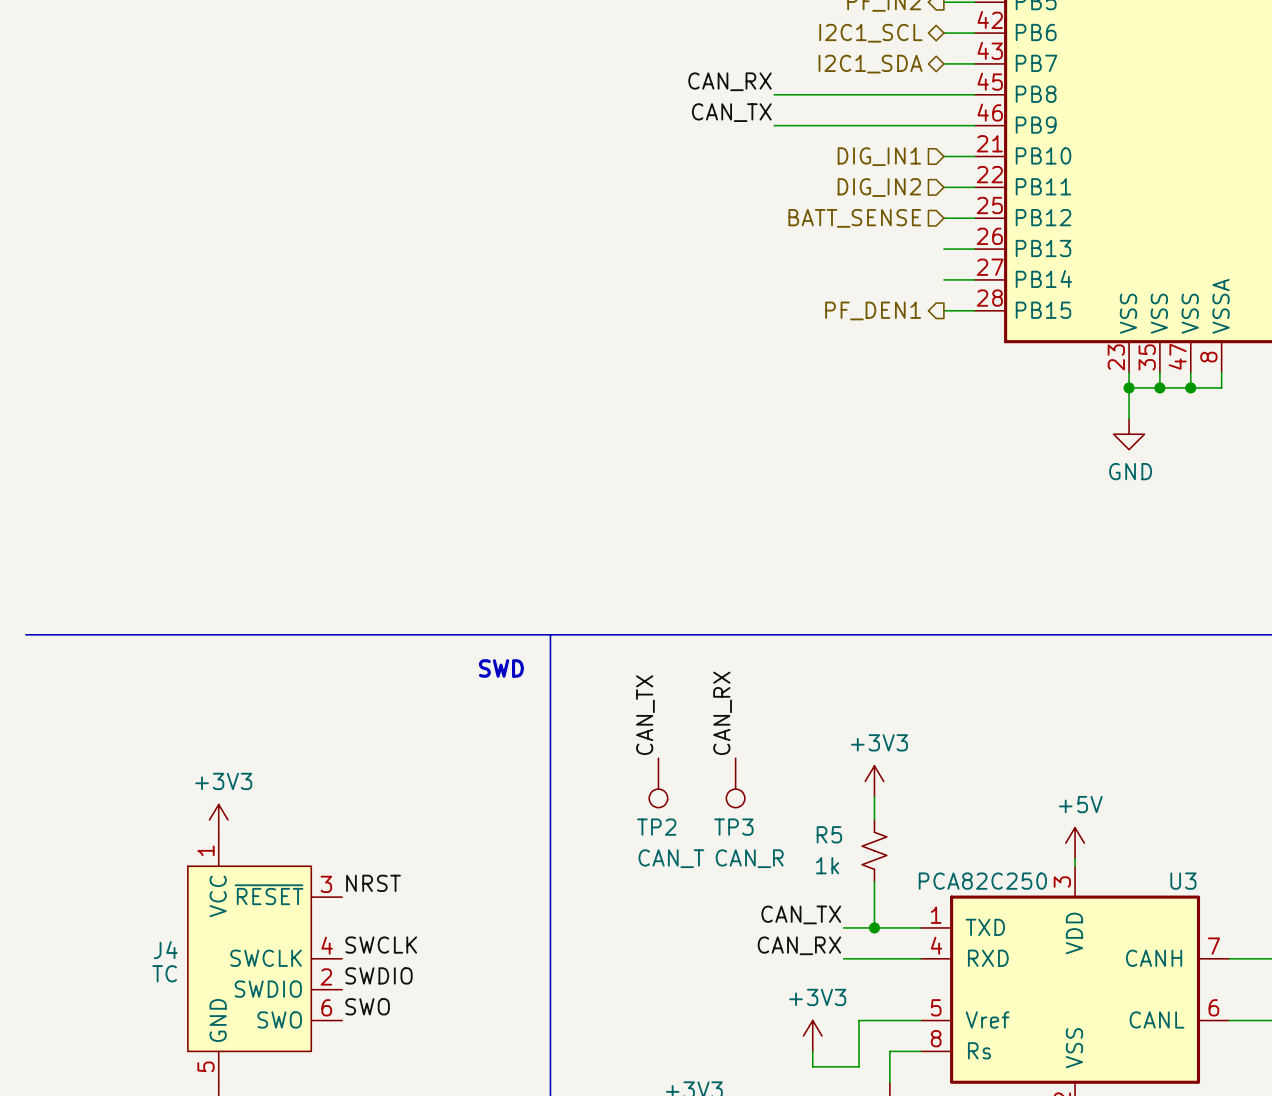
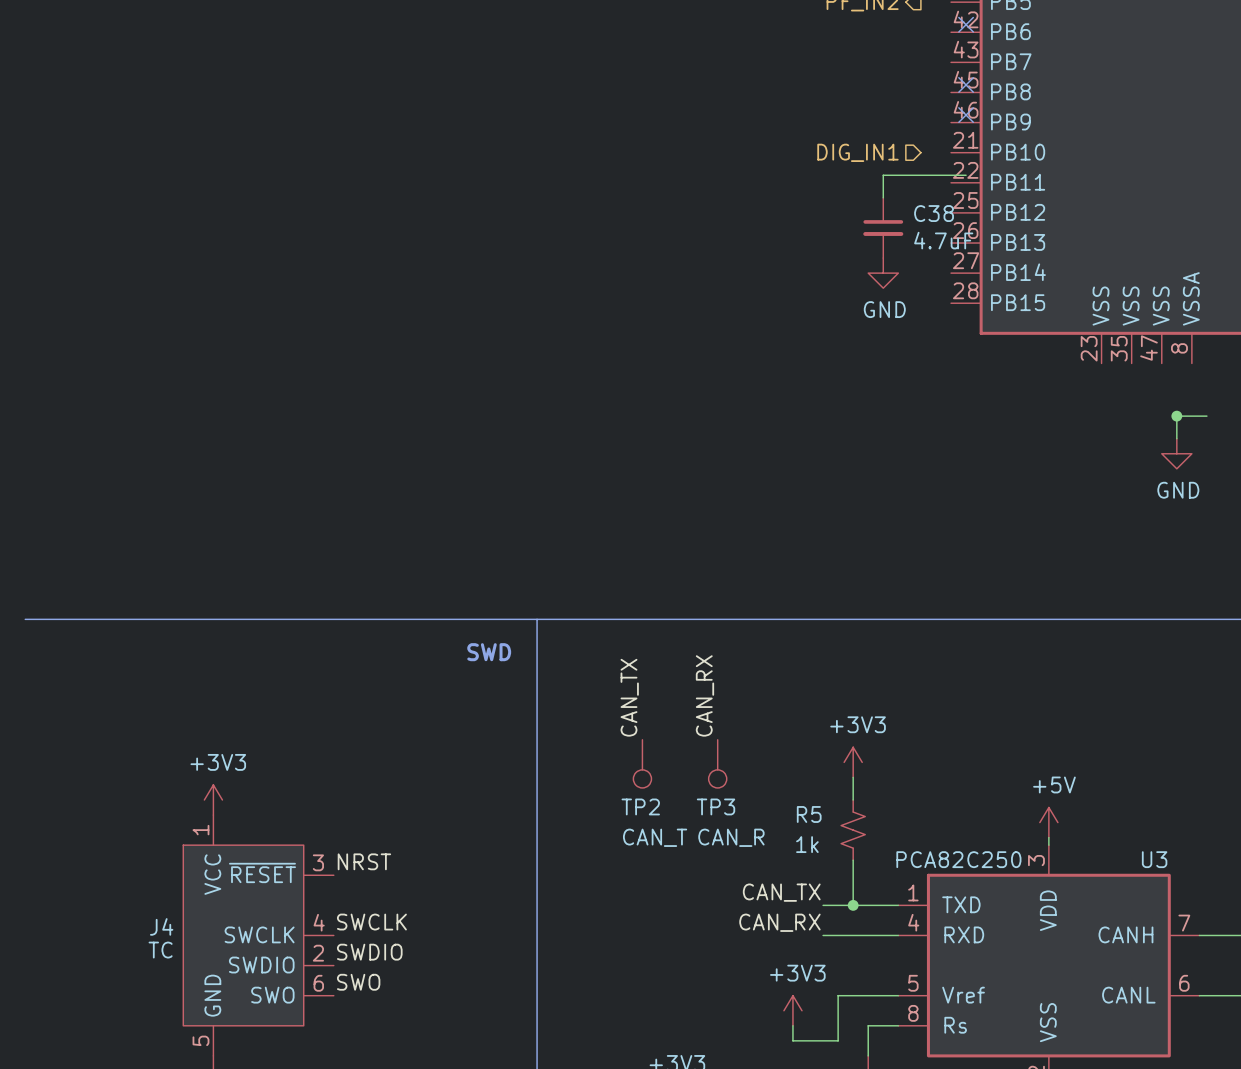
wire: (943, 2) (974, 2) -> none
no-connect mark: none -> (966, 24)
hierarchical label: I2C1_SCL (870, 33) -> none
wire: (943, 33) (974, 33) -> none
wire: (943, 63) (974, 63) -> none
hierarchical label: I2C1_SDA (870, 64) -> none
label: CAN_RX (729, 81) -> none
no-connect mark: none -> (966, 84)
wire: (774, 94) (974, 94) -> none
label: CAN_TX (731, 112) -> none
no-connect mark: none -> (966, 115)
wire: (774, 125) (974, 125) -> none
wire: (943, 156) (974, 156) -> none
wire: none -> (966, 175) (883, 175) (883, 197)
hierarchical label: DIG_IN2 (879, 187) -> none
wire: (943, 187) (974, 187) -> none
hierarchical label: BATT_SENSE (854, 218) -> none
wire: (943, 218) (974, 218) -> none
C38: none -> 4.7uF (883, 227)
wire: (943, 249) (974, 249) -> none
power symbol: none -> GND (883, 273)
wire: (943, 279) (974, 279) -> none
hierarchical label: PF_DEN1 (873, 310) -> none
wire: (943, 310) (974, 310) -> none
wire: (1129, 372) (1129, 418) -> none
wire: (1159, 372) (1159, 387) -> none
wire: (1190, 372) (1190, 387) -> none
wire: (1221, 372) (1221, 387) (1129, 387) -> none
junction: (1129, 387) -> none
junction: (1159, 387) -> none
junction: (1190, 387) -> none
junction: none -> (1176, 416)
wire: none -> (1206, 416) (1176, 416) (1176, 438)
power symbol position: GND (1129, 434) -> GND (1176, 453)

